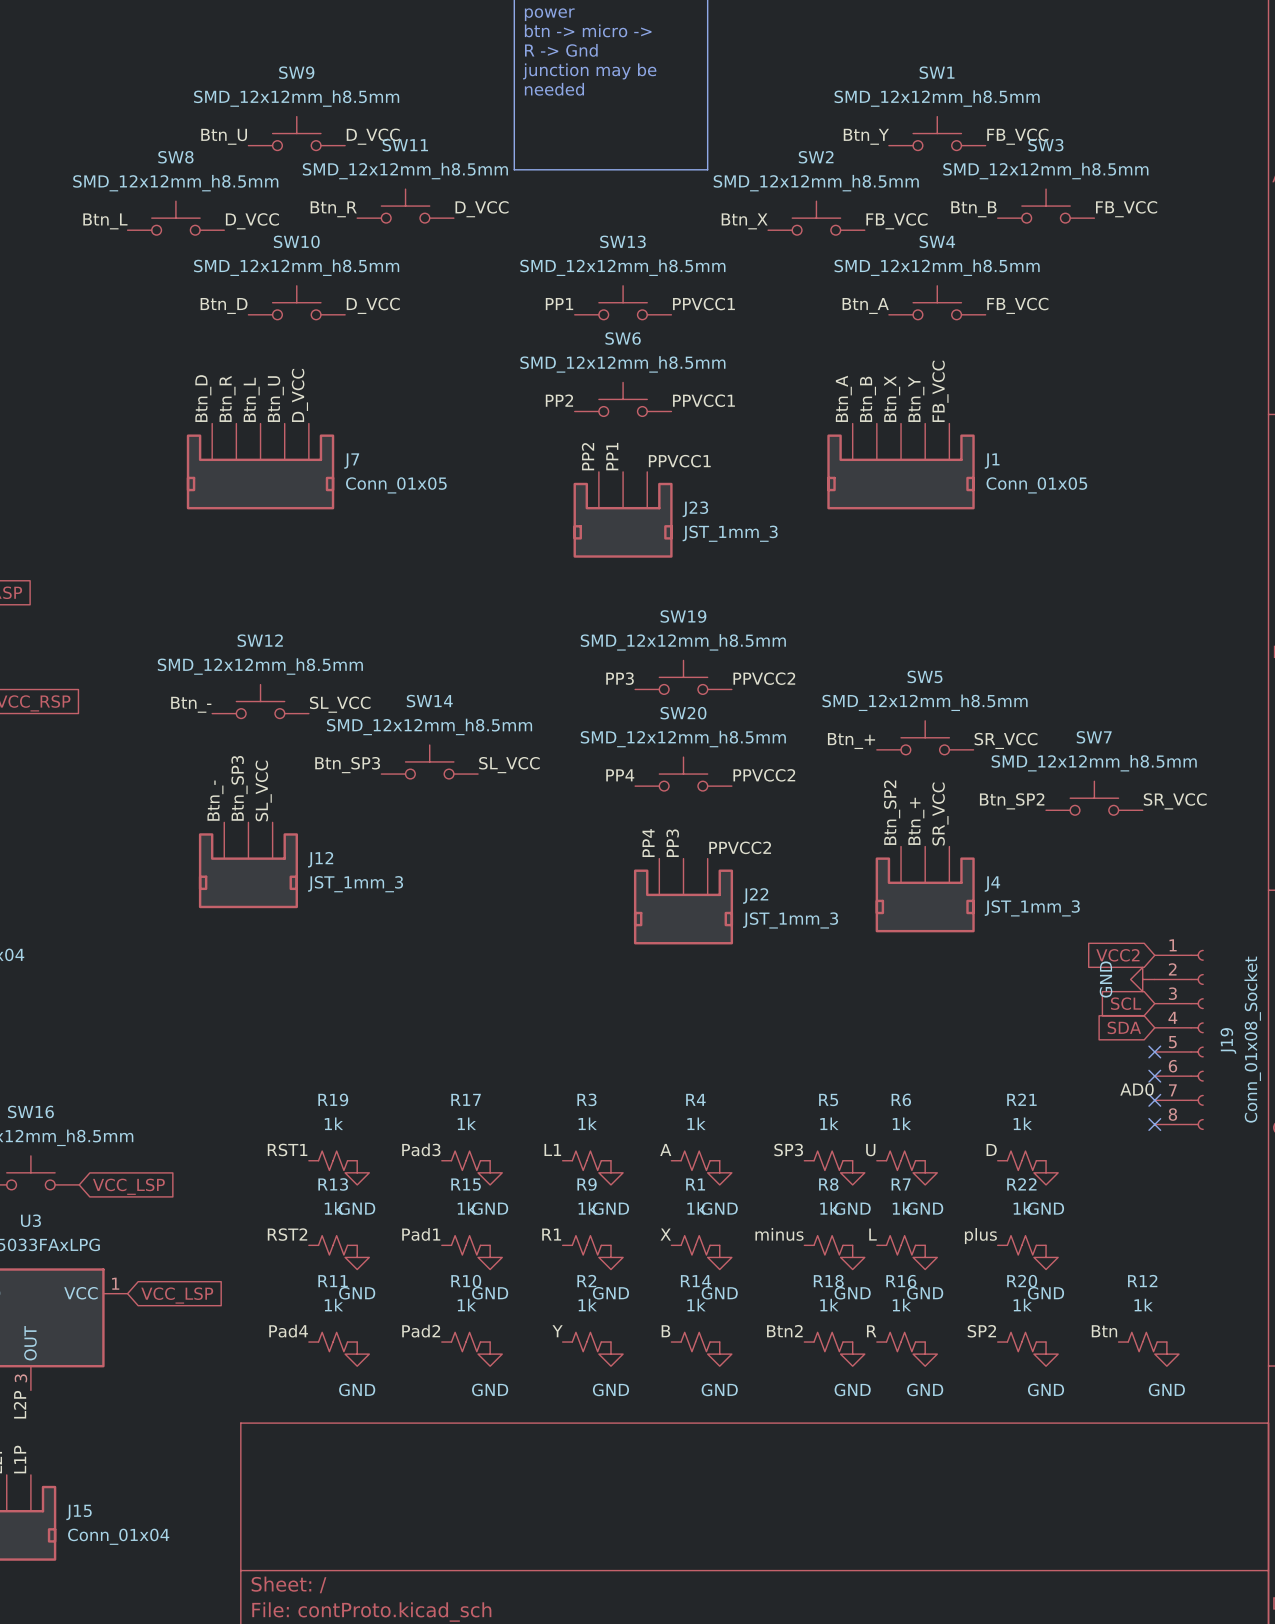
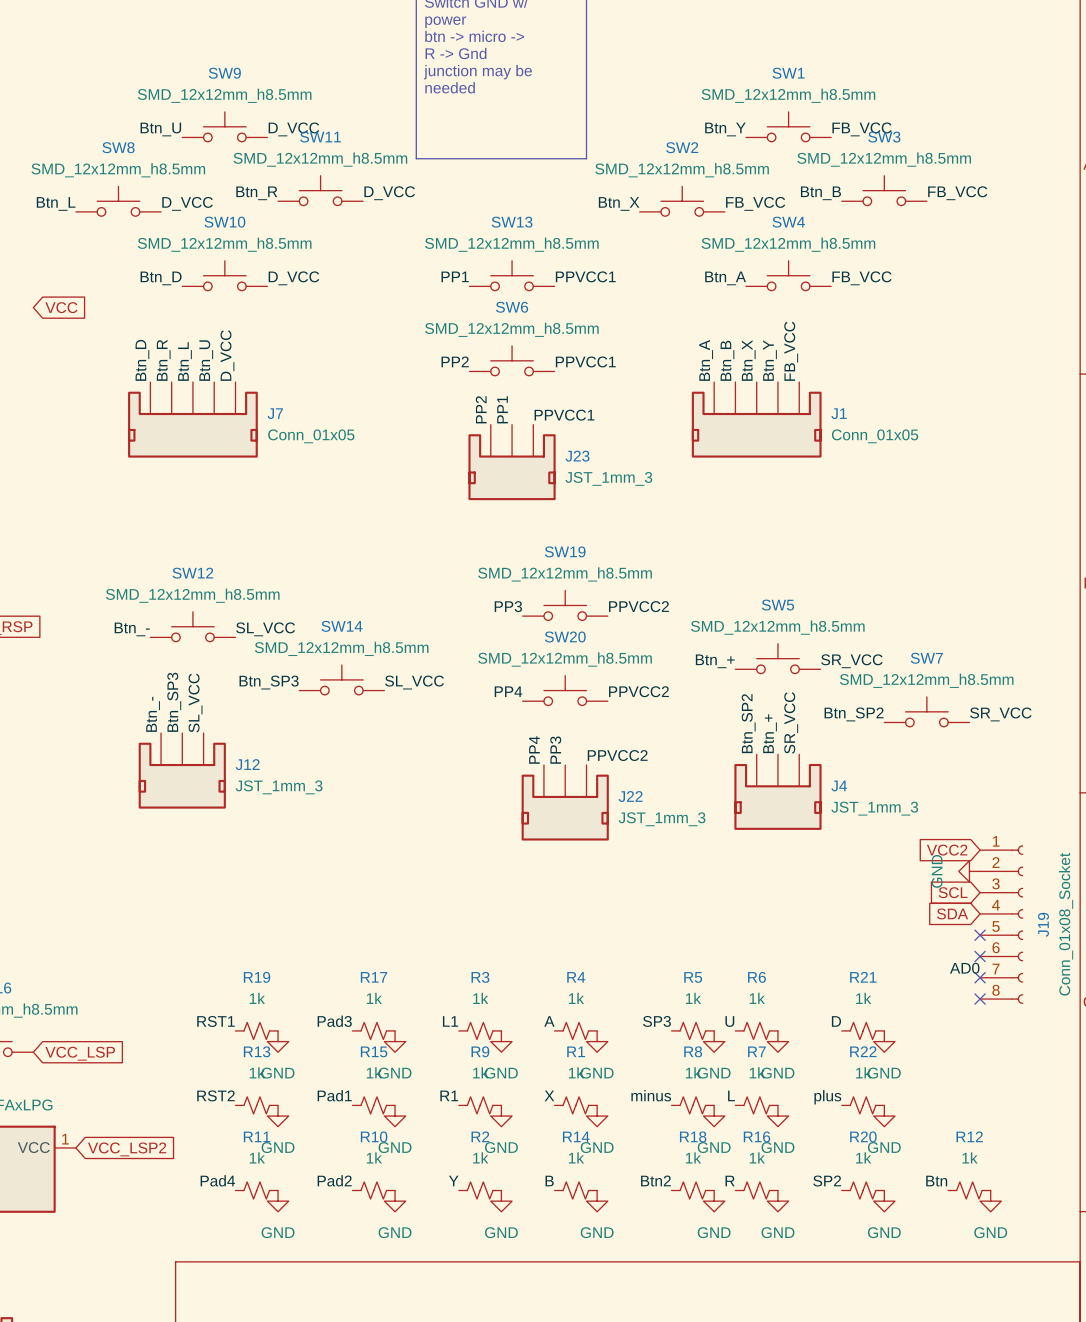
global label: none -> VCC (61, 307)
global label: VCC_LSP (177, 1295) -> VCC_LSP2 (127, 1149)

